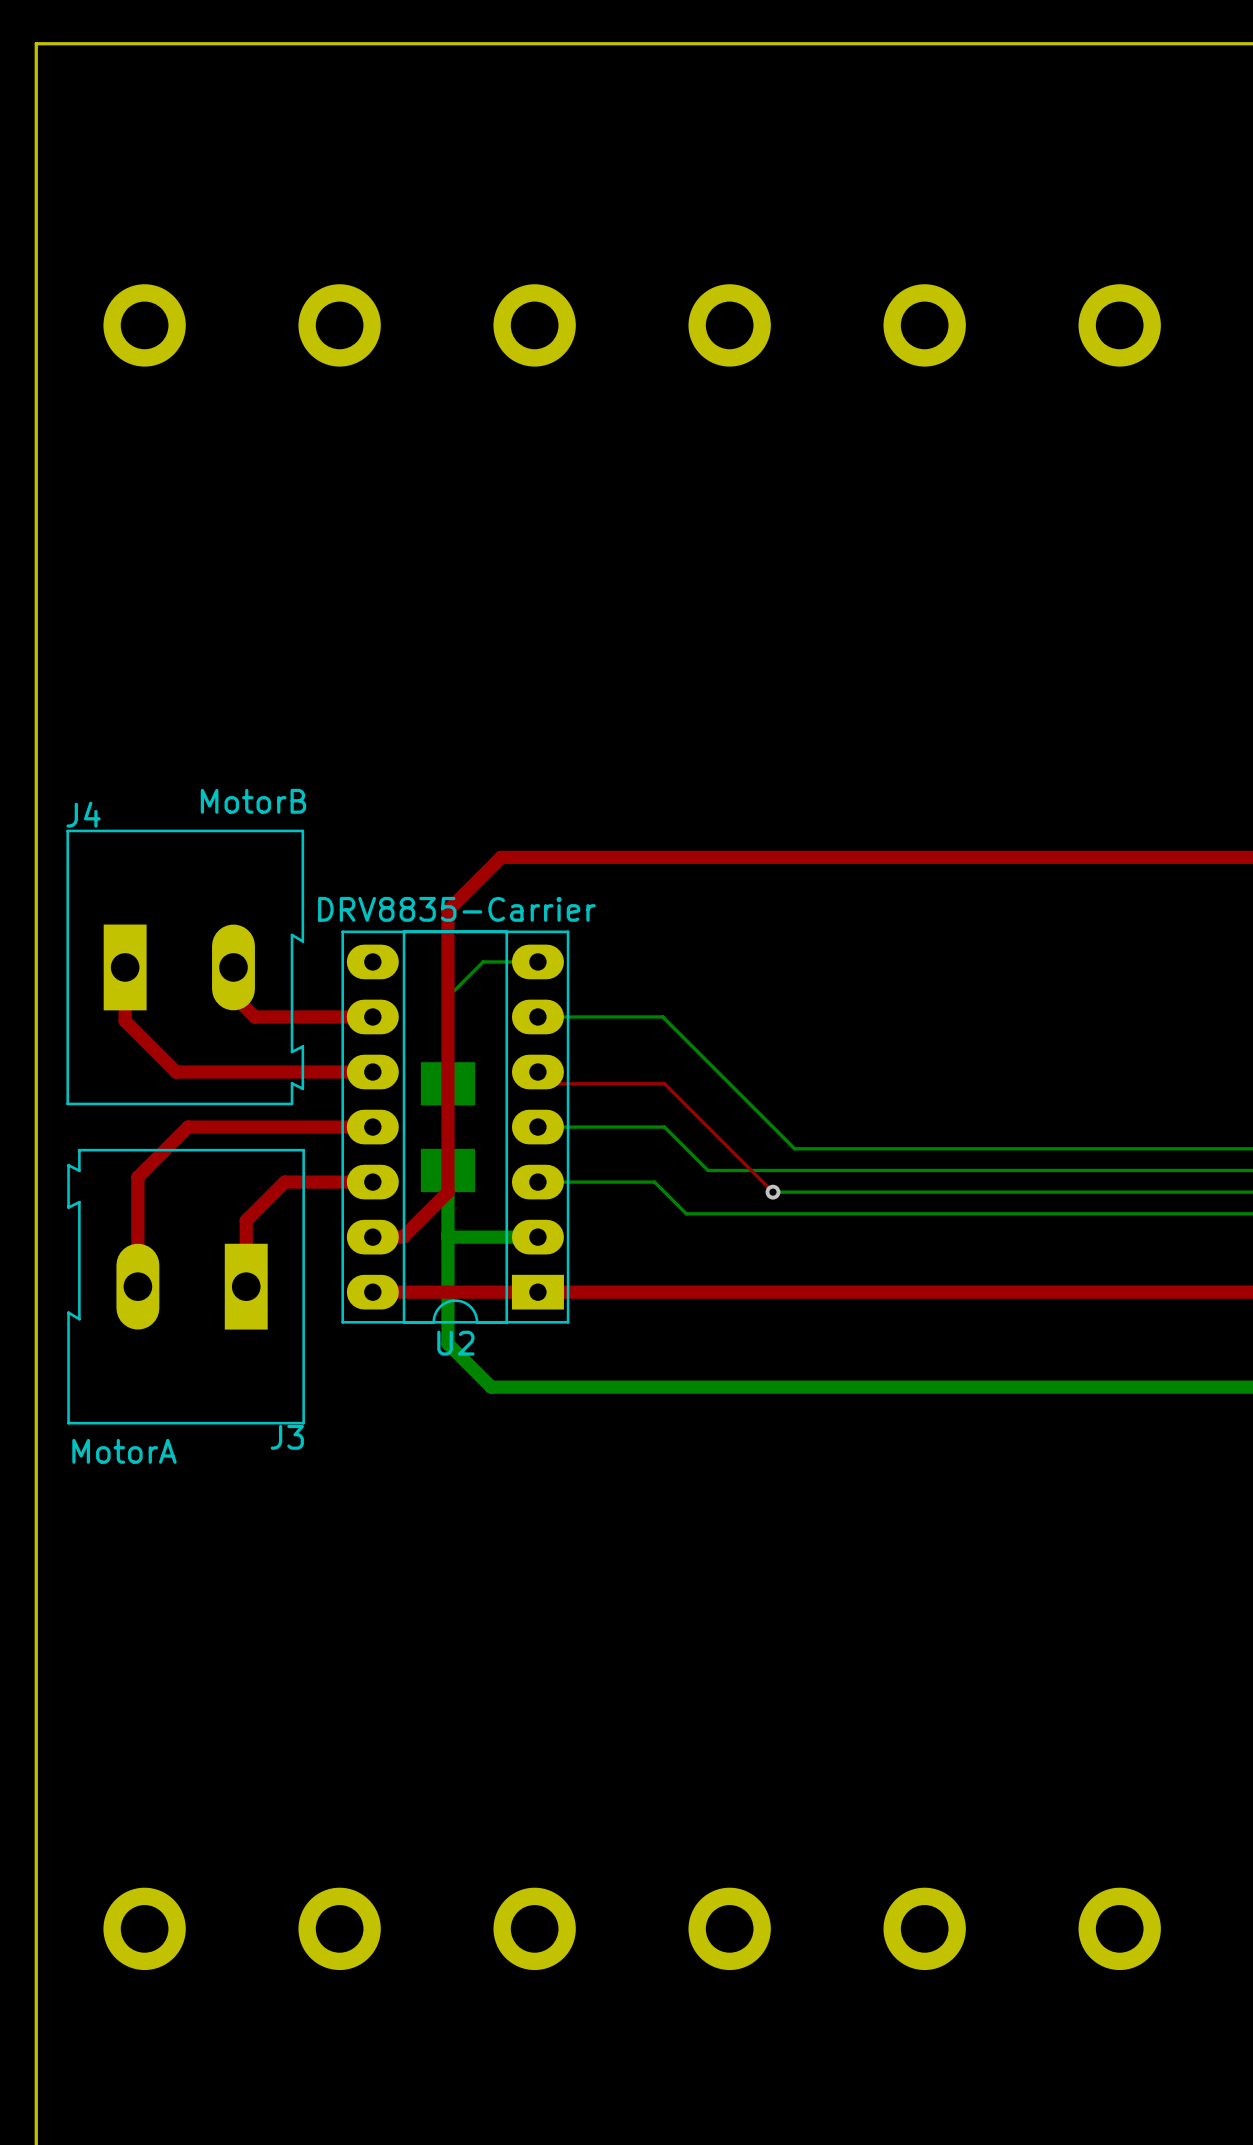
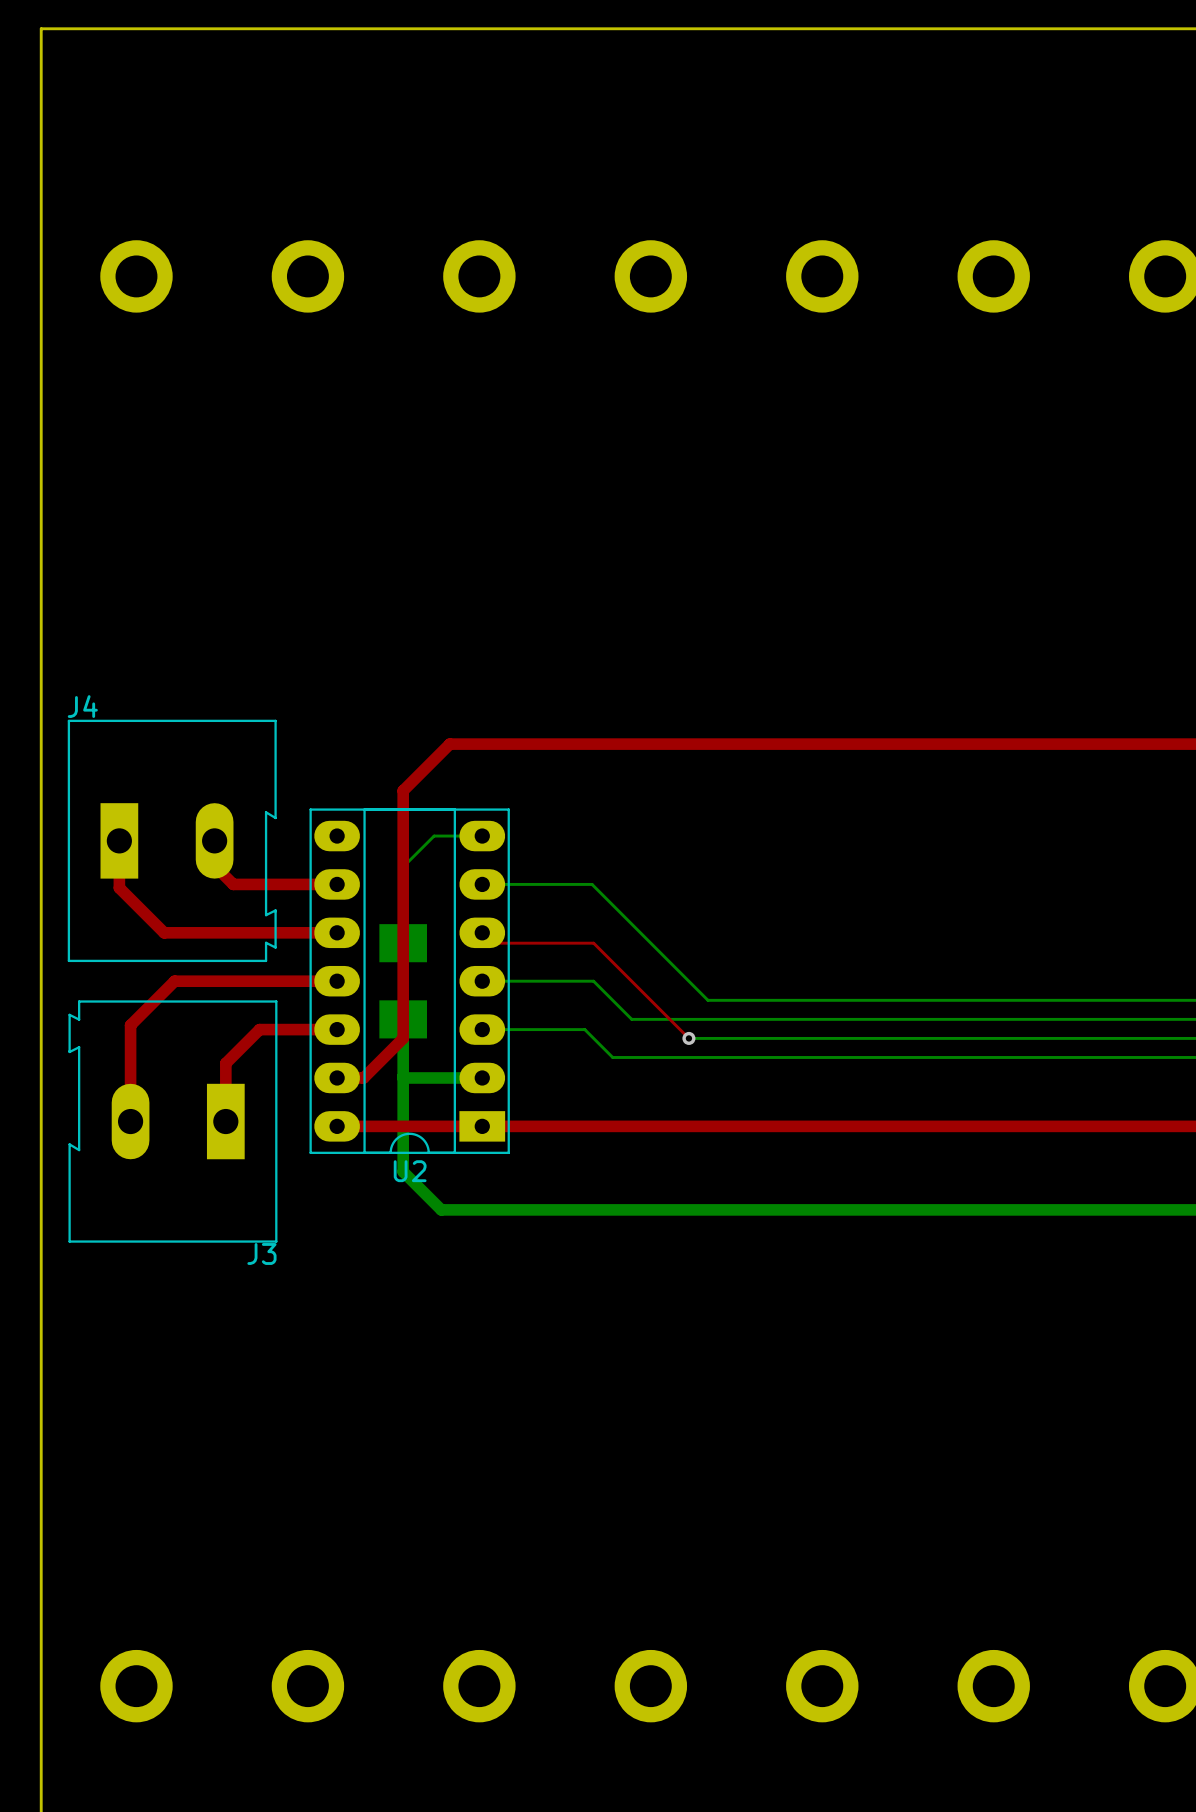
J4 value: MotorB (253, 801) -> none
U2 value: DRV8835-Carrier (456, 909) -> none
J3 value: MotorA (124, 1451) -> none

